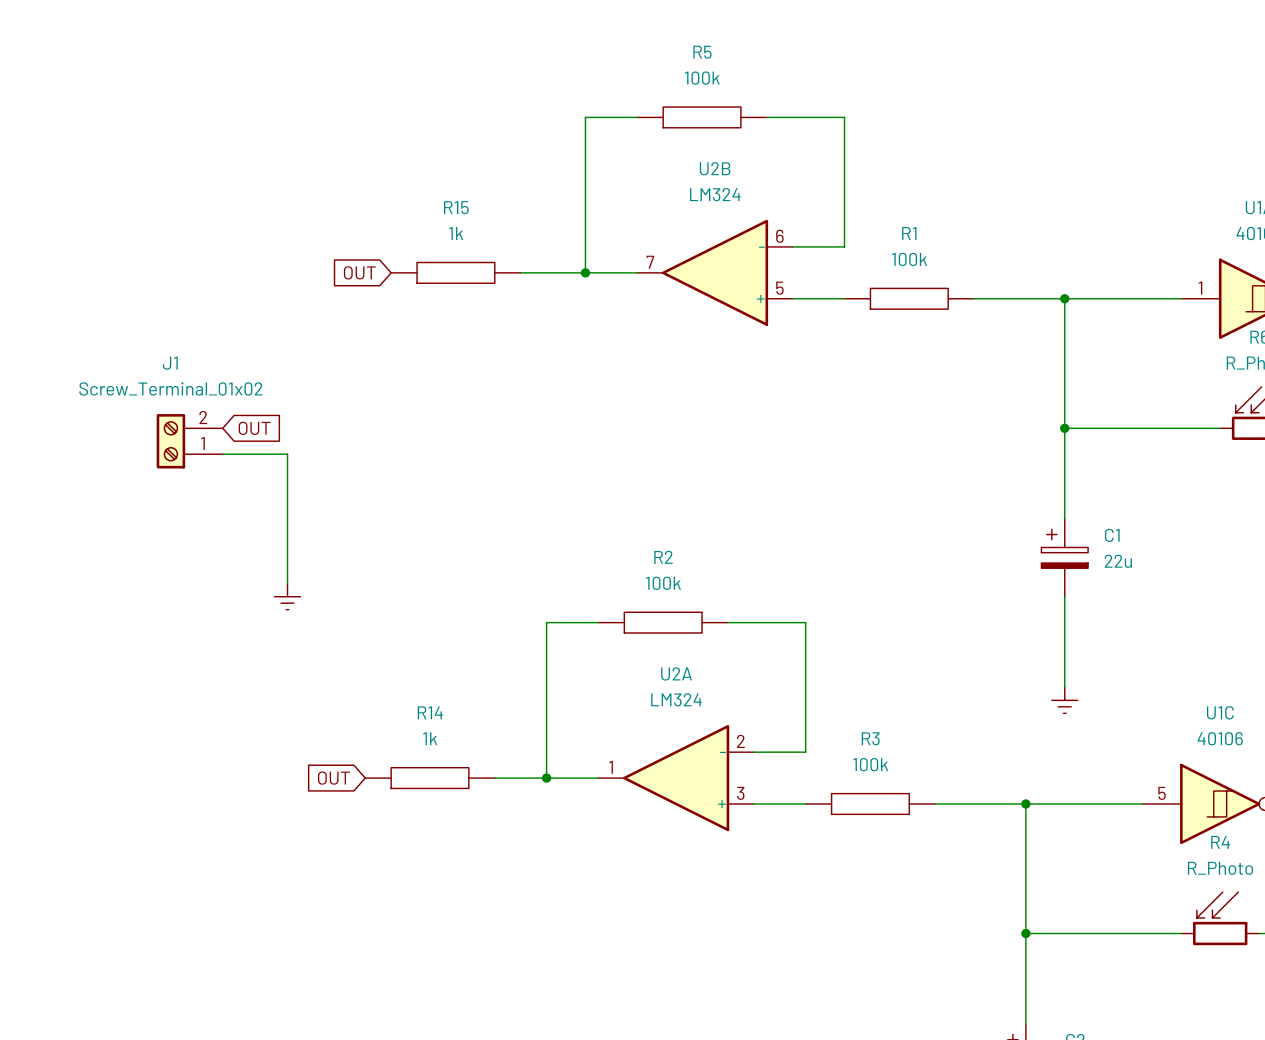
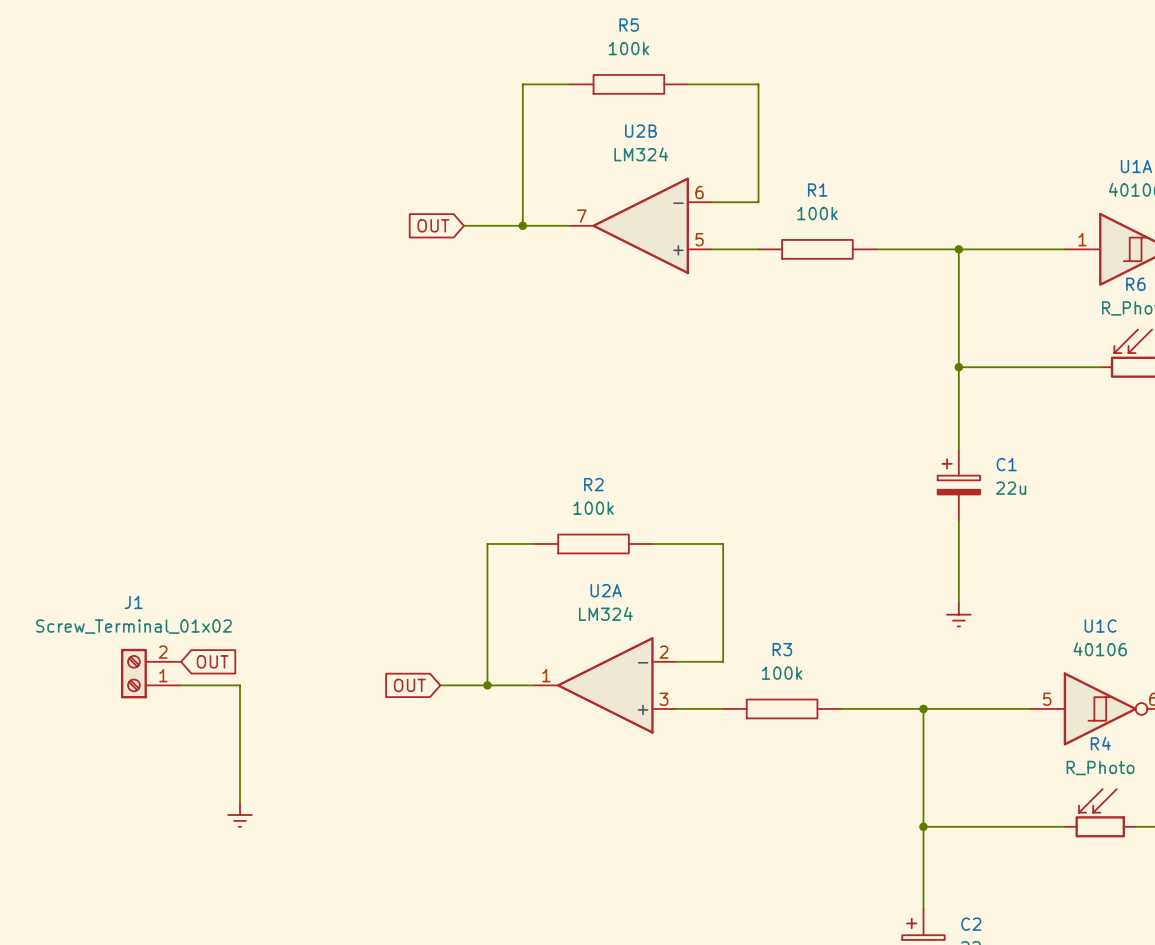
global label position: OUT (359, 272) -> OUT (433, 225)
R15: 1k (455, 272) -> none
global label: OUT (254, 428) -> none
J1 position: (189, 441) -> (151, 673)
wire: (222, 454) (287, 454) (287, 583) -> none
power symbol: (287, 596) -> none
global label: none -> OUT (212, 661)
wire: none -> (181, 685) (240, 685) (240, 803)
global label: OUT (333, 778) -> none
R14: 1k (430, 778) -> none
global label: none -> OUT (409, 685)
power symbol: none -> (240, 815)

